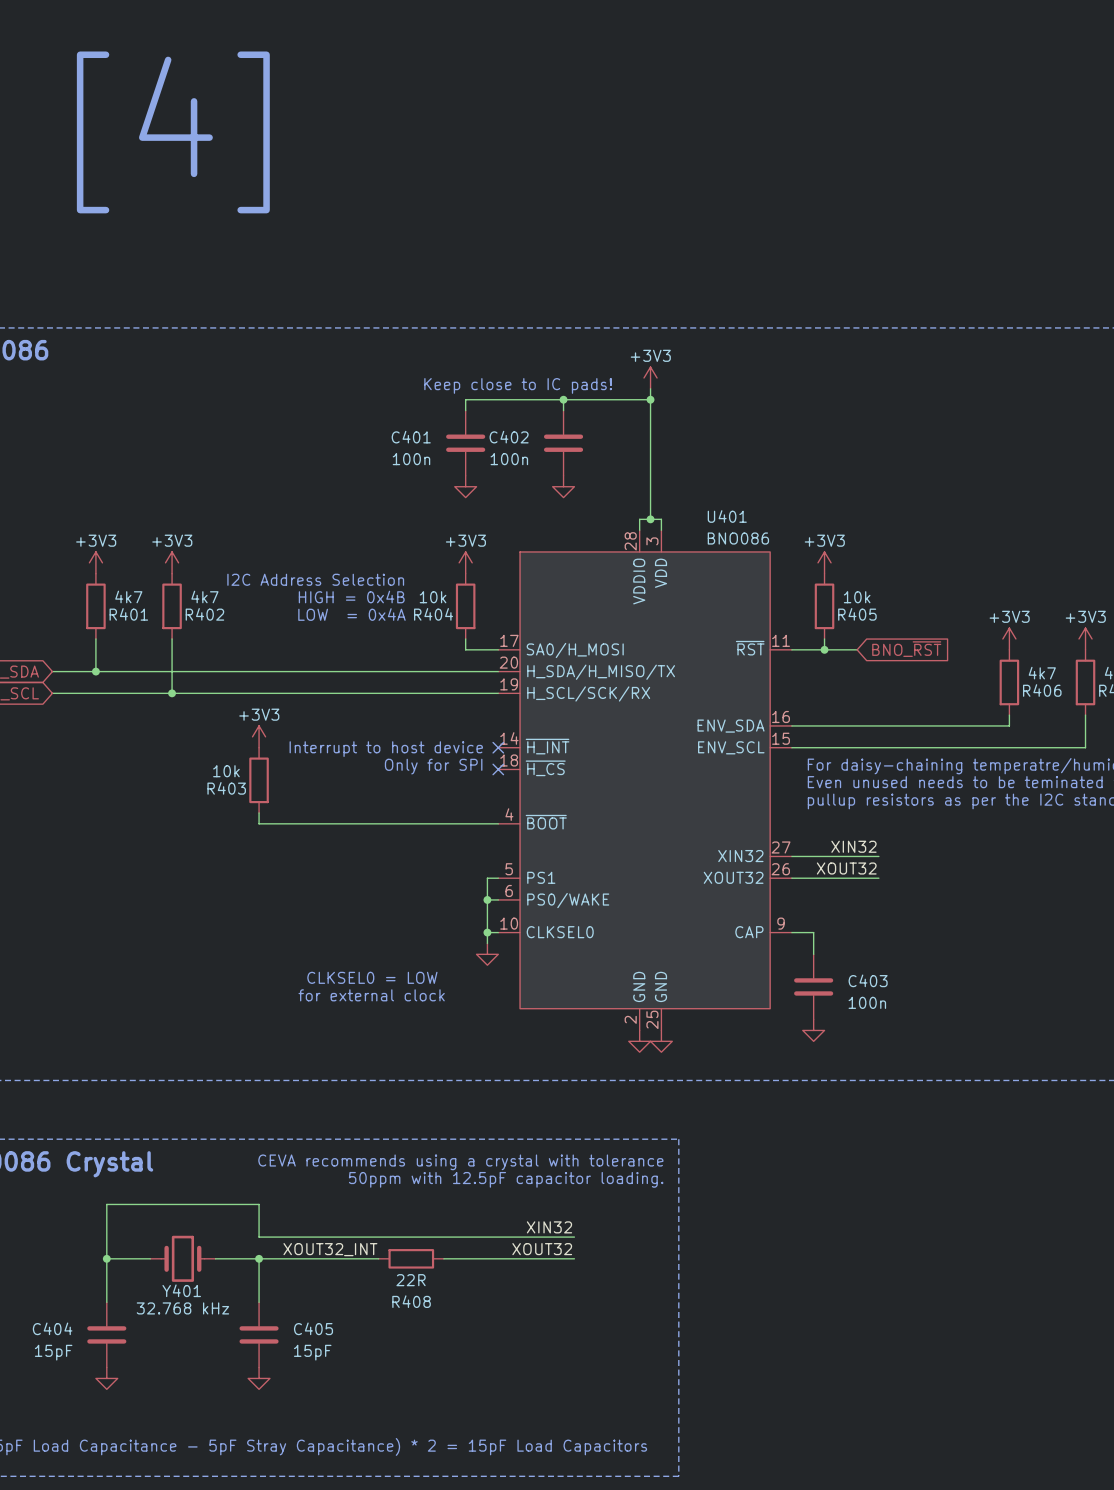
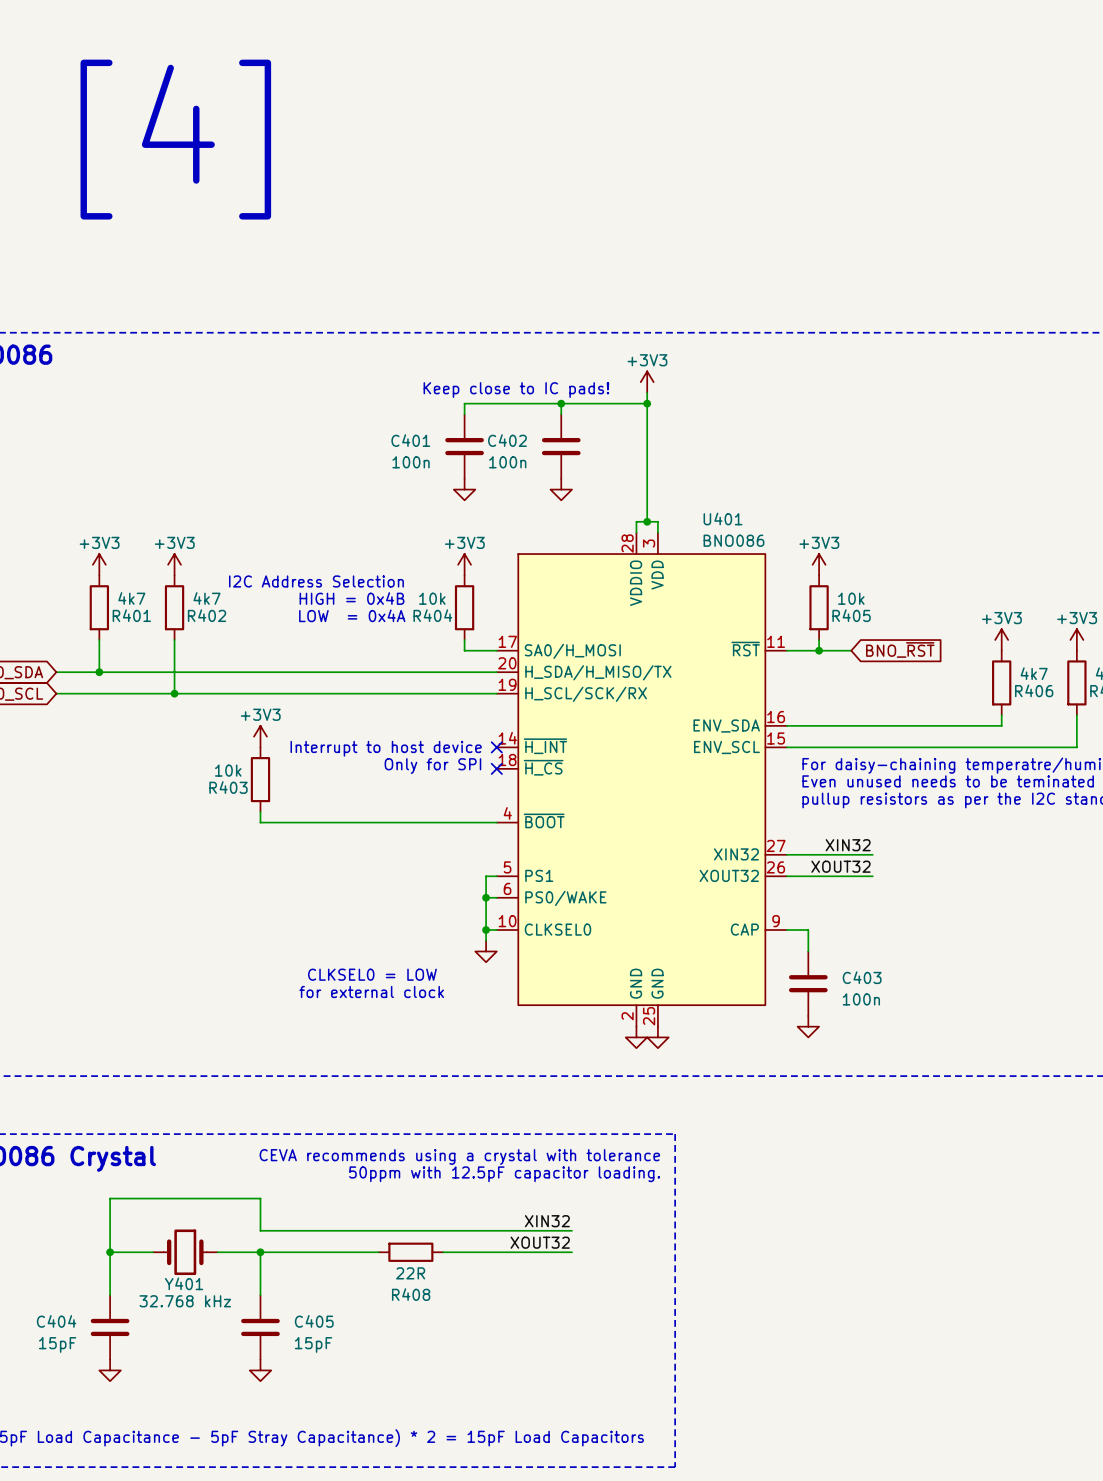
label: XOUT32_INT (330, 1249) -> none

